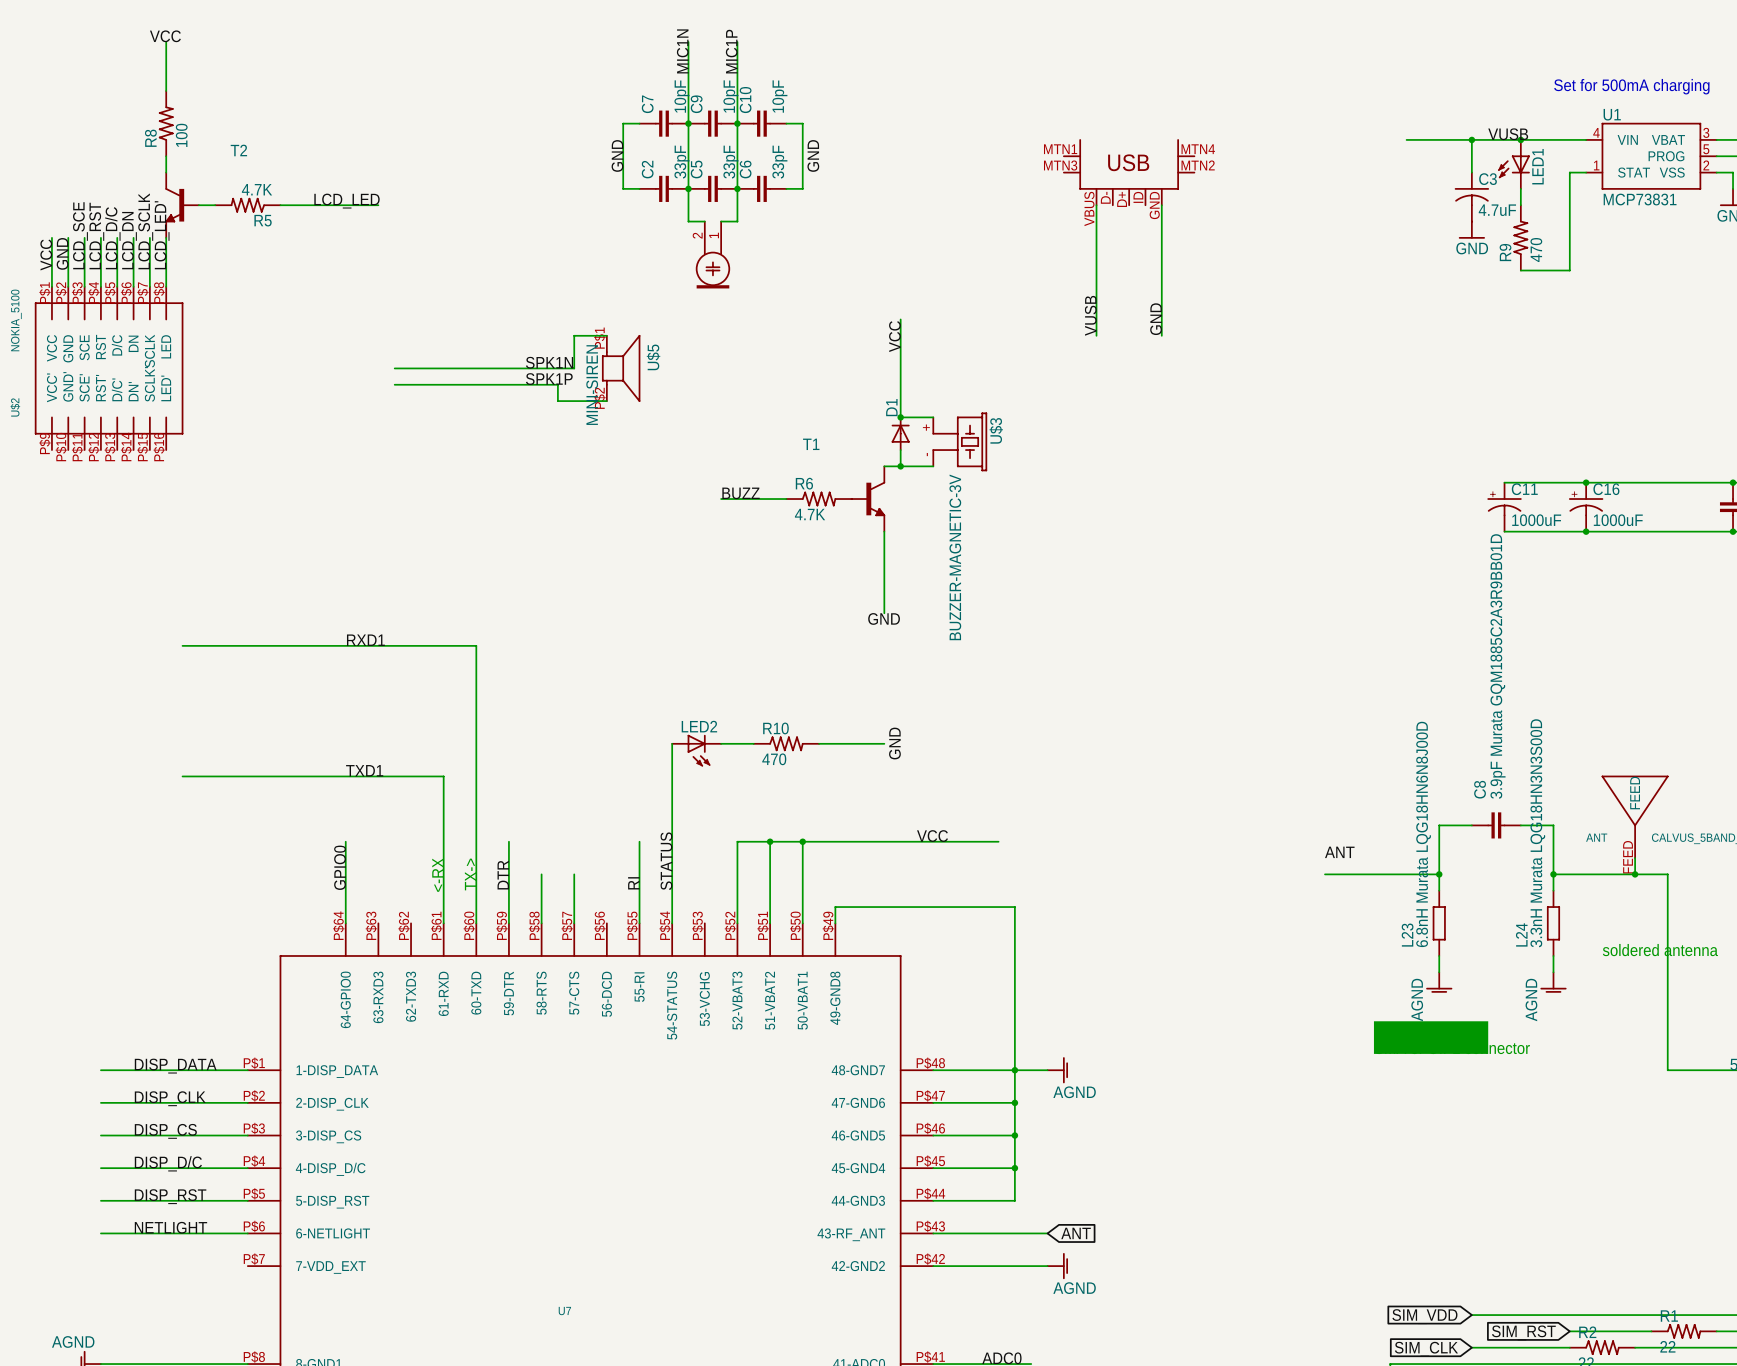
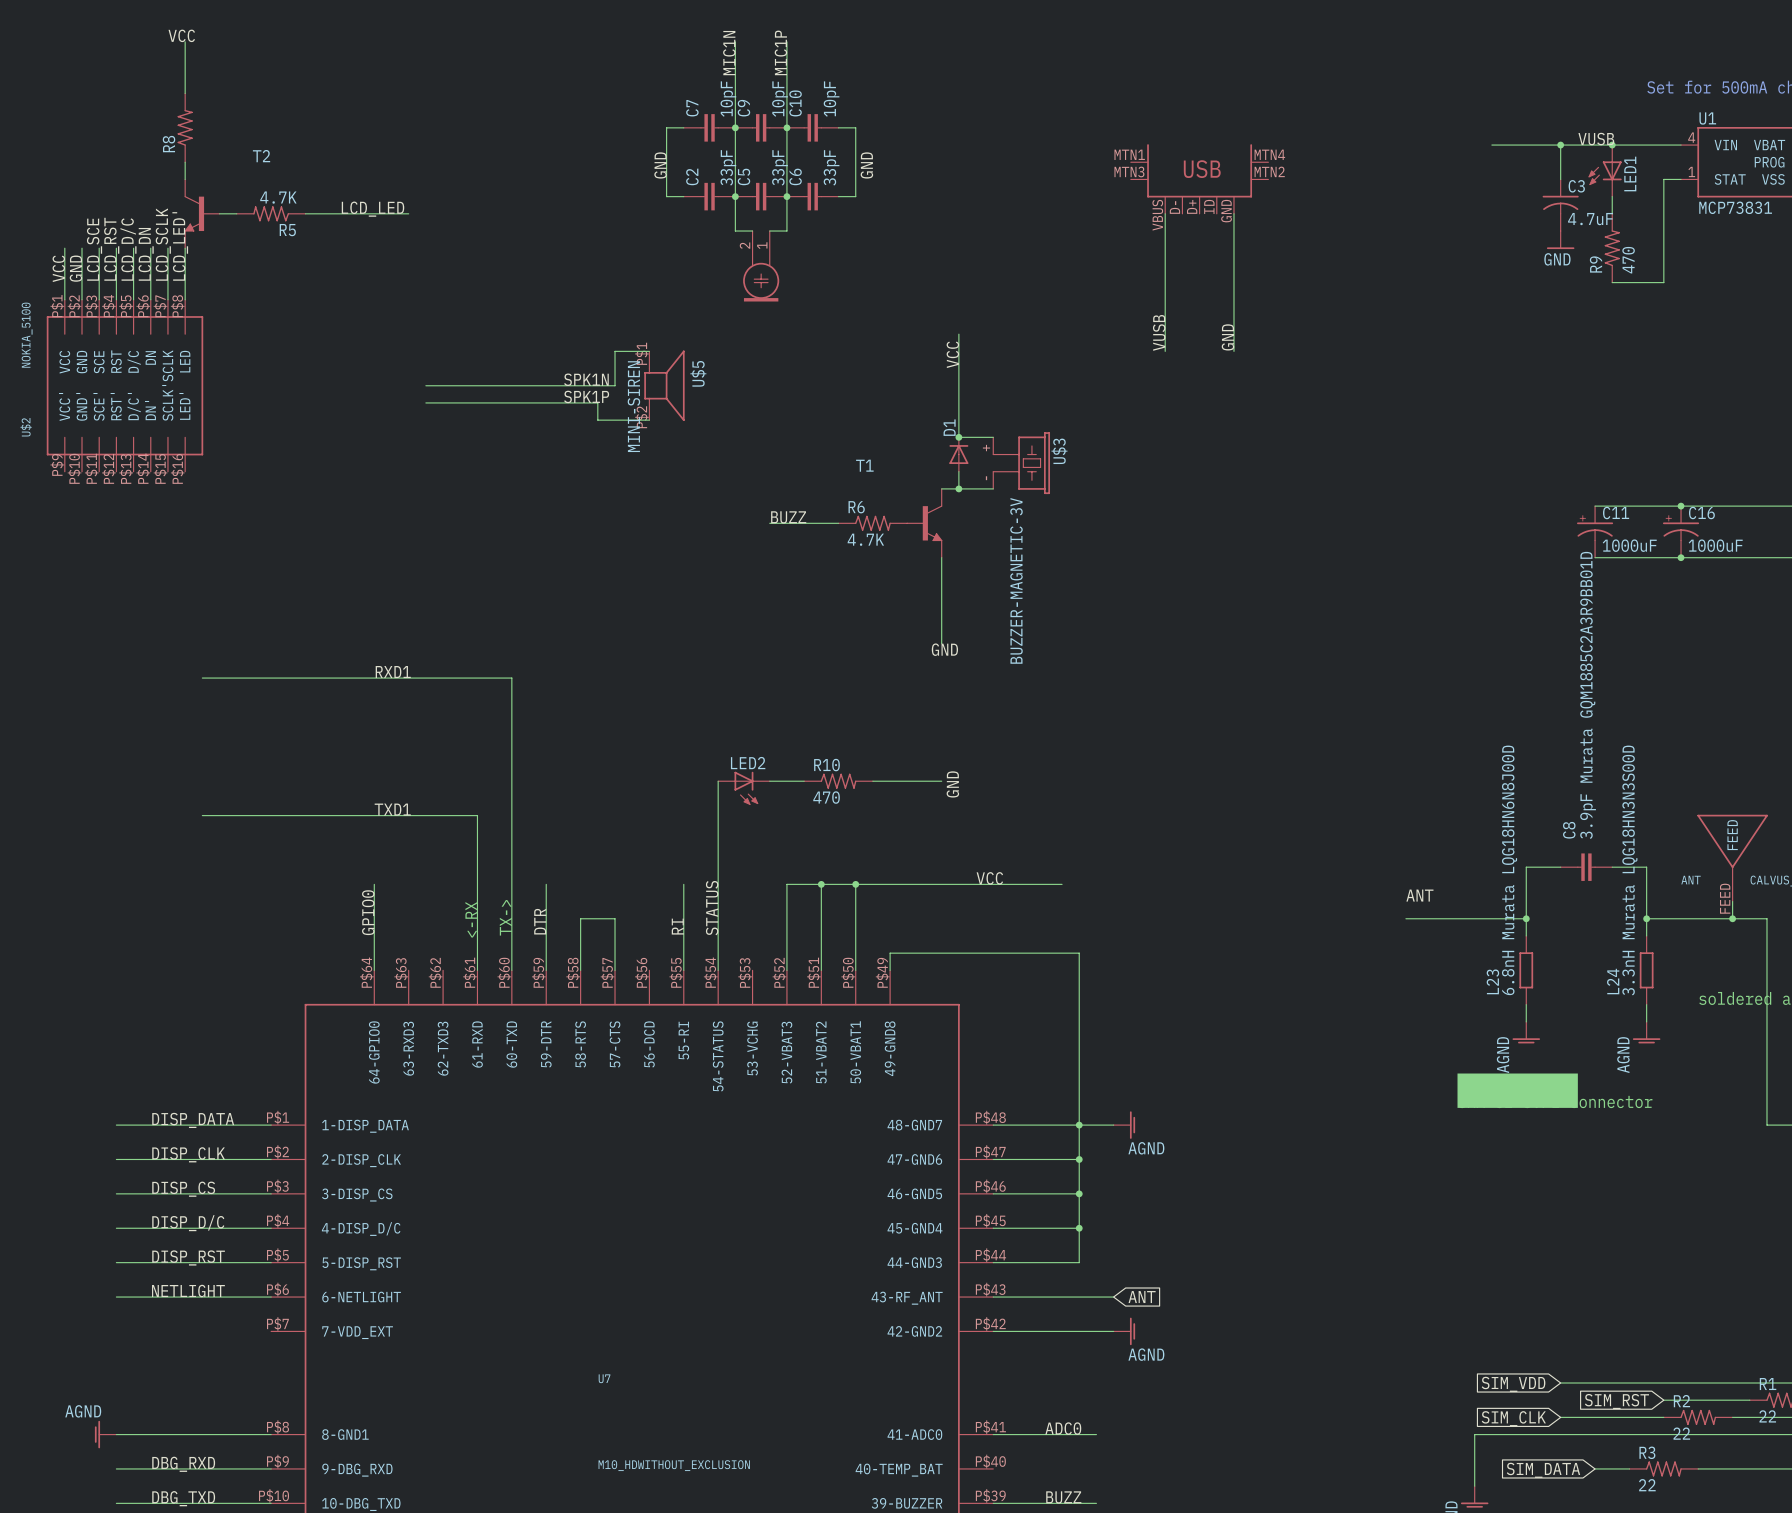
R8 value: 100 (181, 135) -> none
wire: none -> (580, 918) (615, 918)

